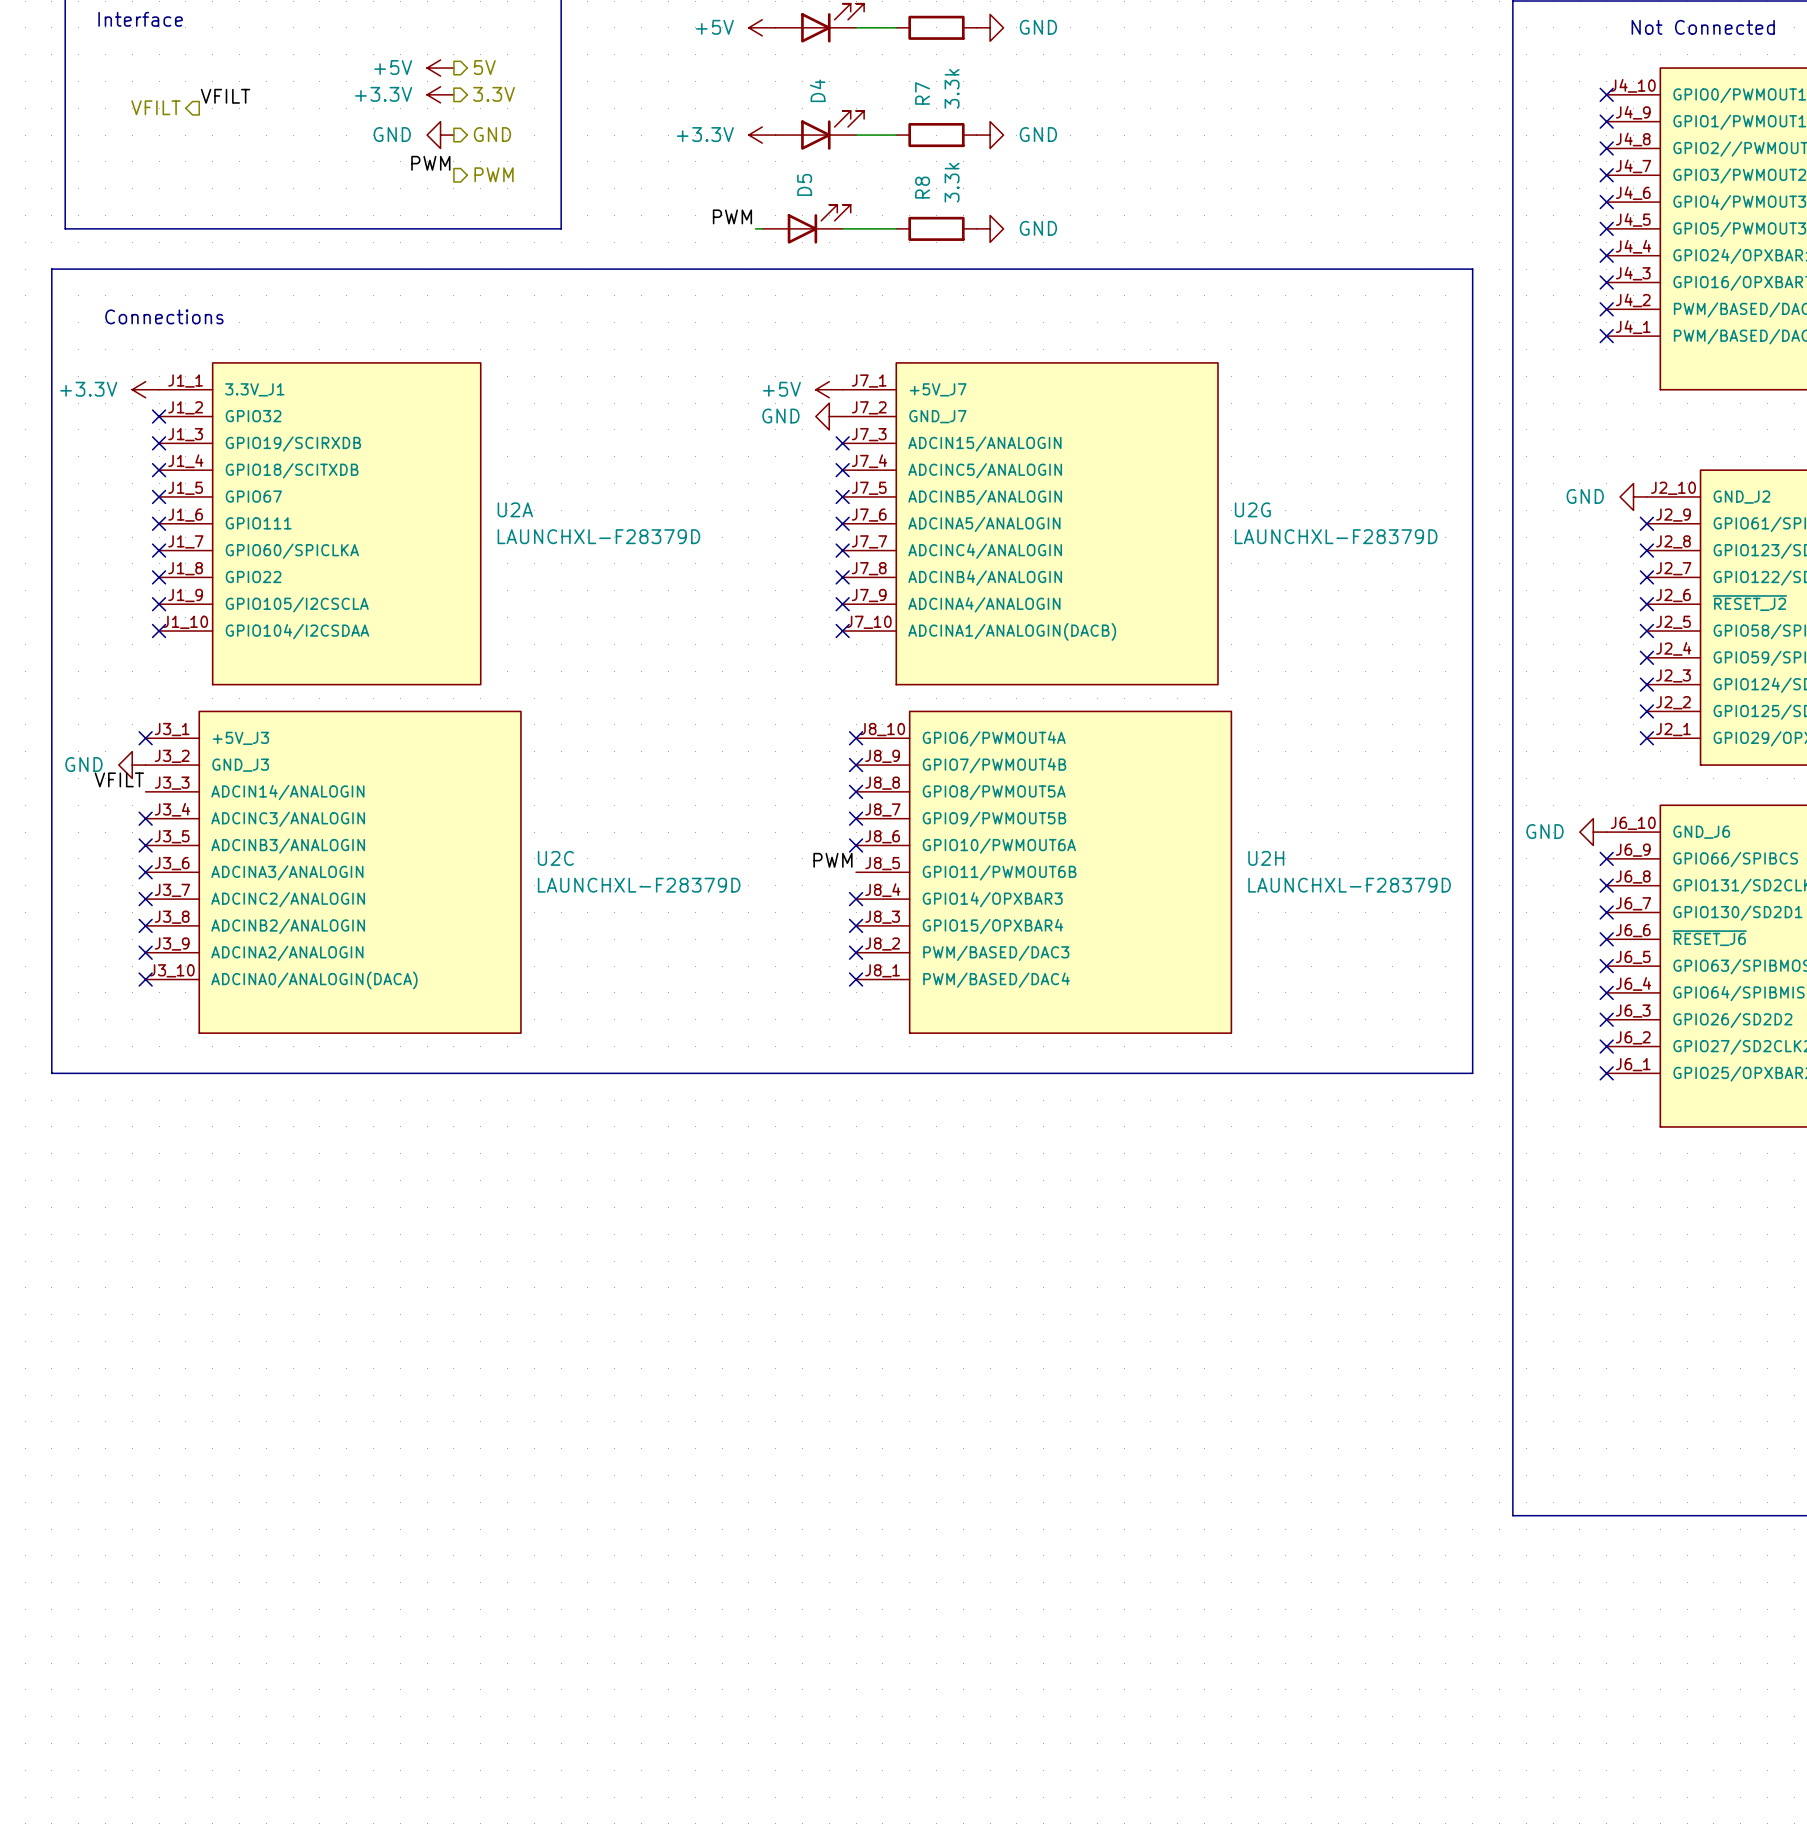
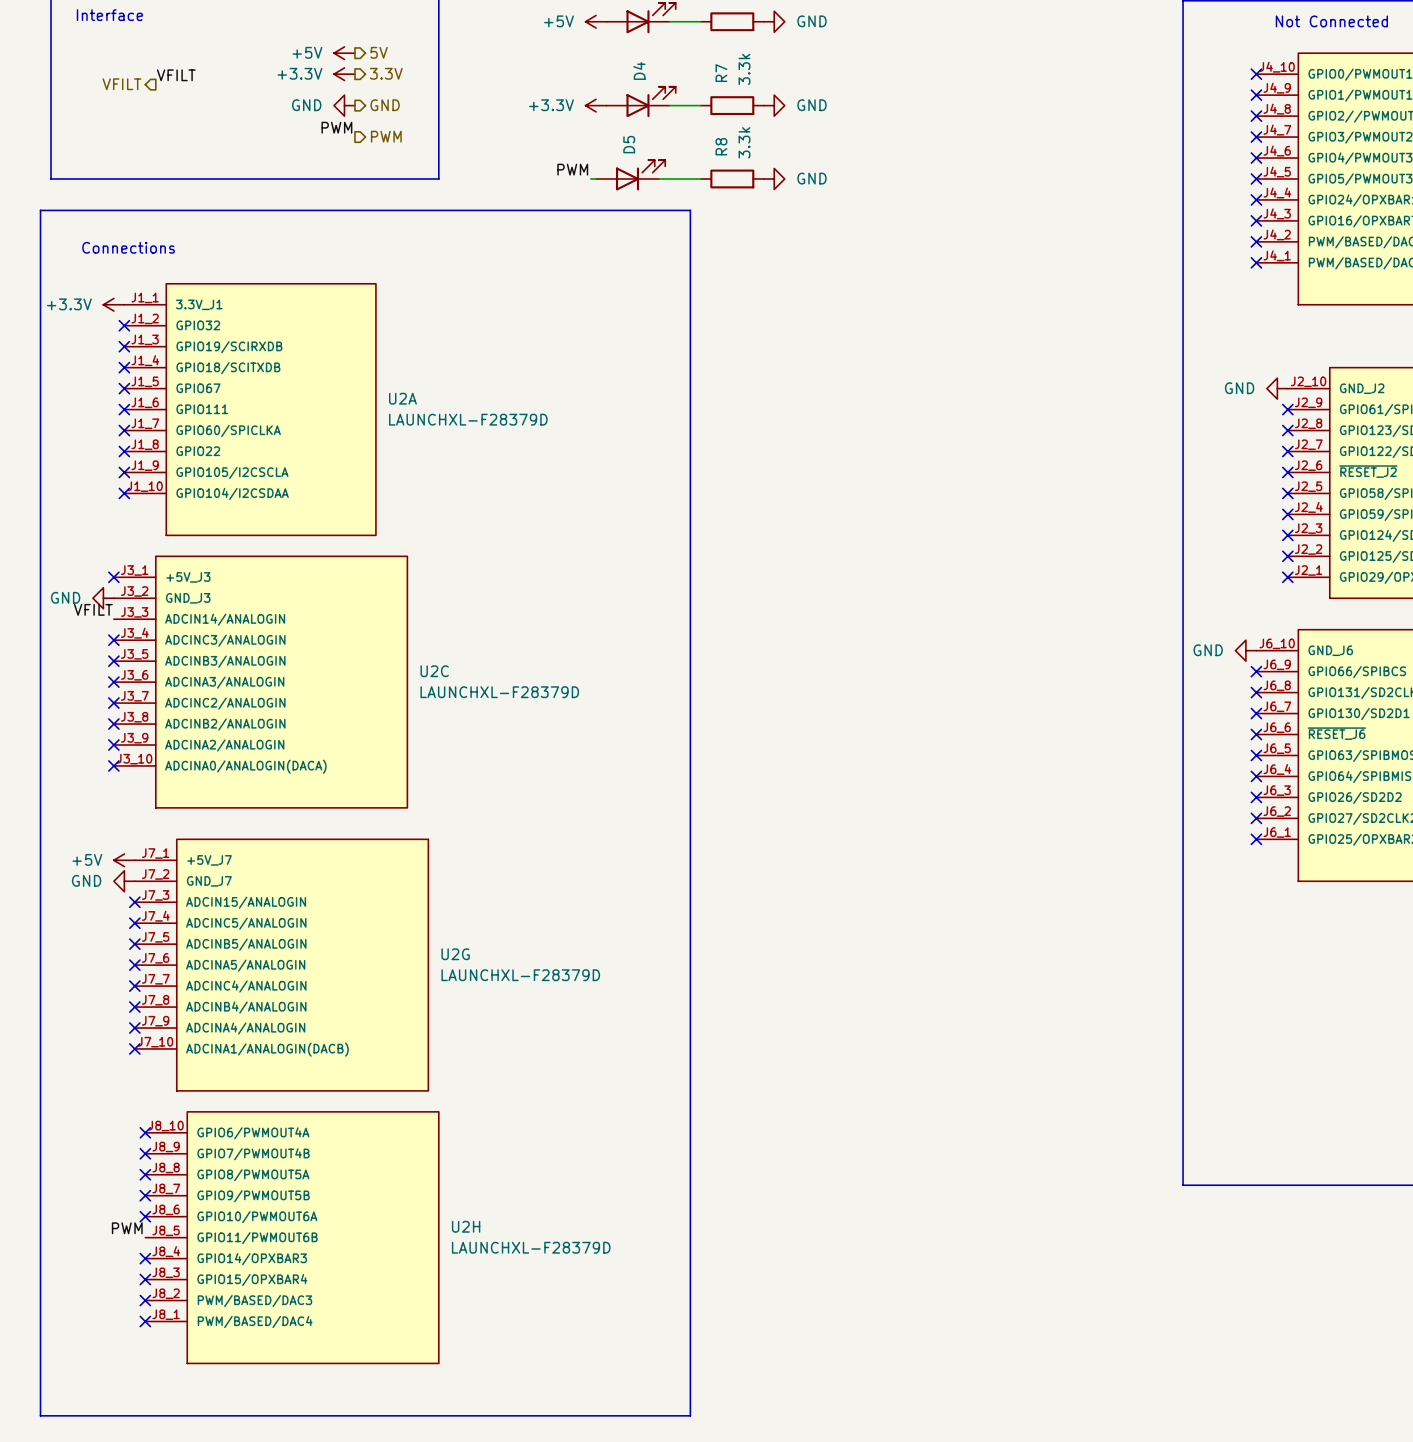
line: (882, 269) (1472, 269) (1472, 1073) (51, 1073) -> (690, 210) (690, 1415) (40, 1415) (40, 839)
power symbol: +5V (829, 389) -> none
power symbol: GND (829, 416) -> none
no-connect mark: (842, 443) -> none
no-connect mark: (842, 470) -> none
no-connect mark: (842, 496) -> none
no-connect mark: (842, 523) -> none
U2G position: (1030, 523) -> (281, 965)
no-connect mark: (842, 550) -> none
no-connect mark: (842, 577) -> none
no-connect mark: (842, 604) -> none
no-connect mark: (842, 631) -> none
no-connect mark: (856, 738) -> none
no-connect mark: (856, 765) -> none
no-connect mark: (856, 791) -> none
no-connect mark: (856, 818) -> none
no-connect mark: (856, 845) -> none
label: PWM (832, 860) -> none
U2H position: (1044, 872) -> (292, 1237)
no-connect mark: (856, 899) -> none
no-connect mark: (856, 925) -> none
no-connect mark: (856, 952) -> none
no-connect mark: (856, 979) -> none
power symbol: none -> +5V (124, 860)
power symbol: none -> GND (124, 881)
no-connect mark: none -> (134, 902)
no-connect mark: none -> (134, 923)
no-connect mark: none -> (134, 944)
no-connect mark: none -> (134, 965)
no-connect mark: none -> (134, 986)
no-connect mark: none -> (134, 1007)
no-connect mark: none -> (134, 1028)
no-connect mark: none -> (134, 1048)
no-connect mark: none -> (145, 1132)
no-connect mark: none -> (145, 1153)
no-connect mark: none -> (145, 1174)
no-connect mark: none -> (145, 1195)
no-connect mark: none -> (145, 1216)
label: none -> PWM (127, 1228)
no-connect mark: none -> (145, 1258)
no-connect mark: none -> (145, 1279)
no-connect mark: none -> (145, 1300)
no-connect mark: none -> (145, 1321)

